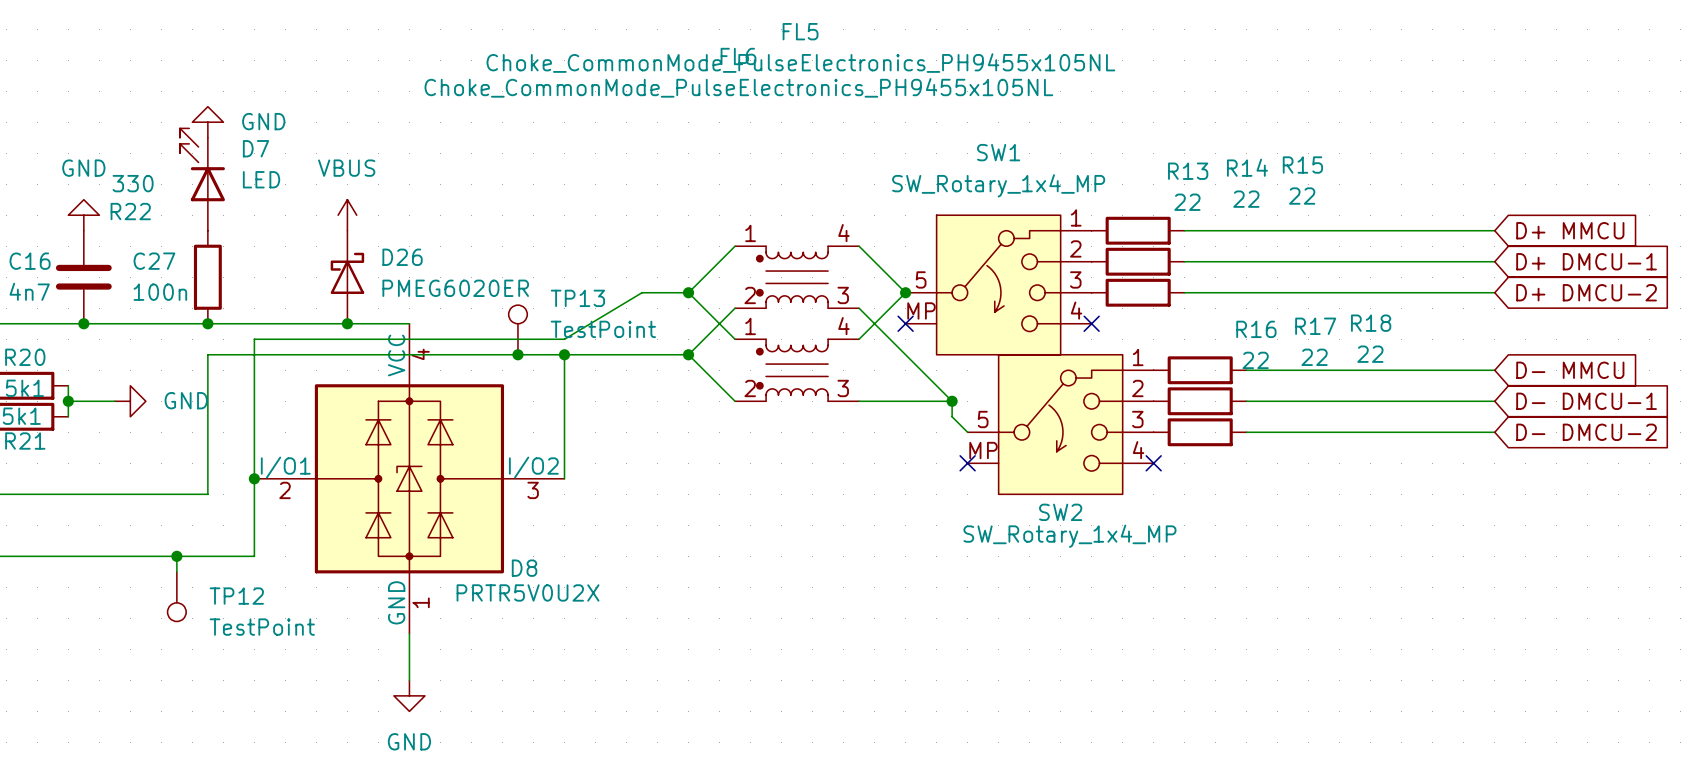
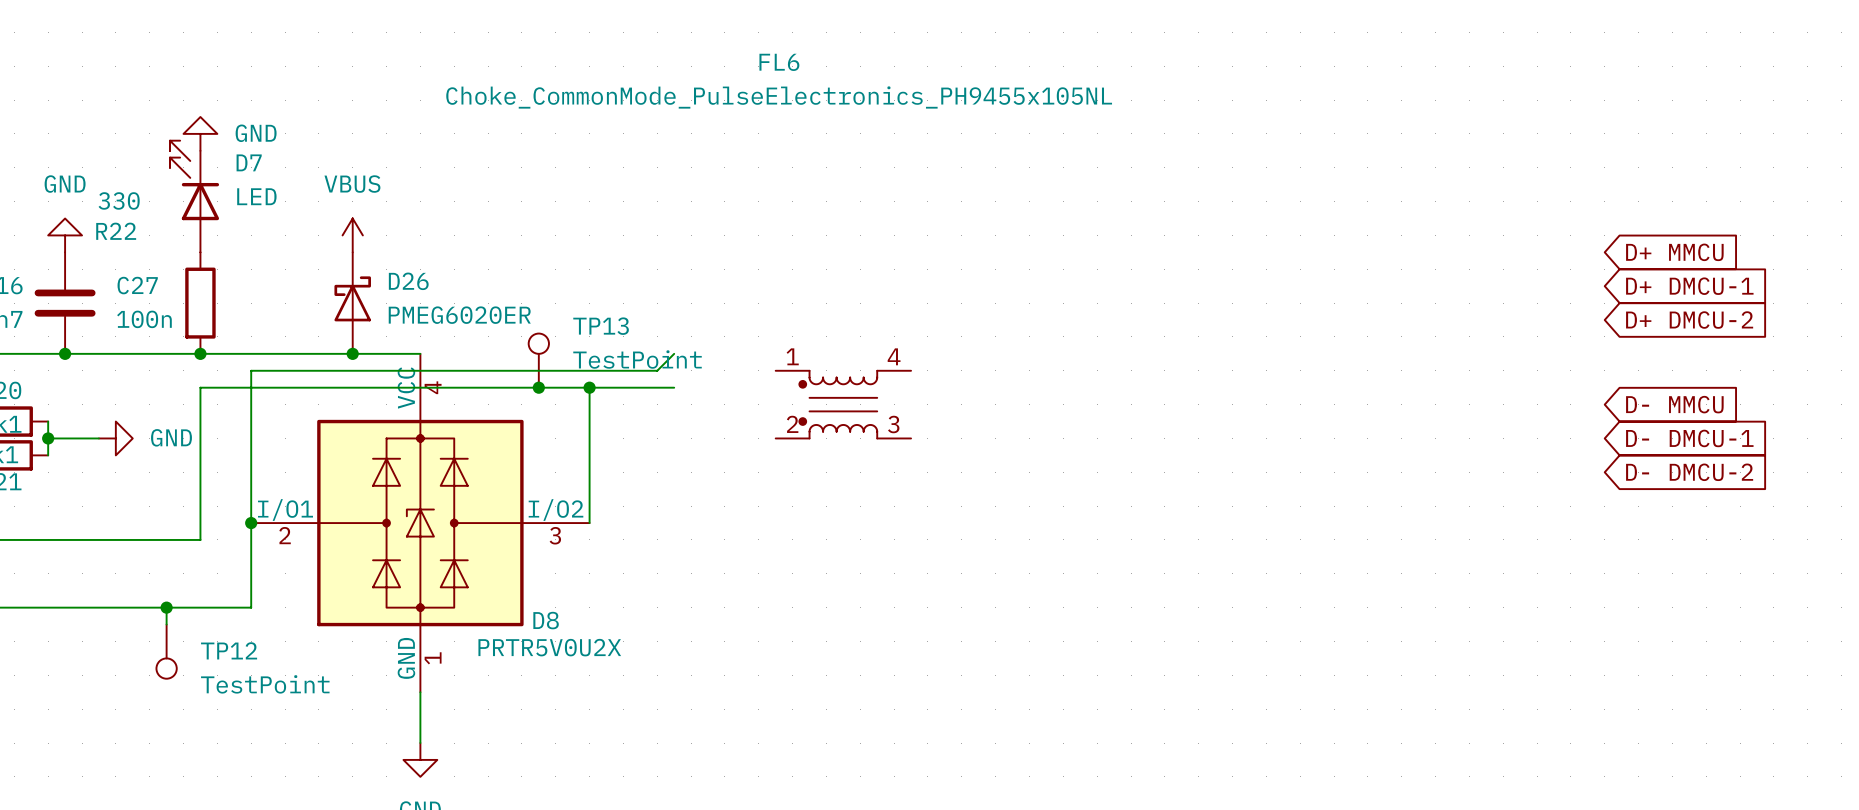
R13: 22 (1138, 230) -> none
wire: (1184, 230) (1494, 230) -> none
wire: (735, 246) (688, 292) -> none
wire: (859, 246) (905, 292) (859, 339) -> none
R14: 22 (1138, 261) -> none
wire: (1184, 261) (1494, 261) -> none
FL5: Choke_CommonMode_PulseElectronics_PH9455x105NL (797, 277) -> none
SW1: SW_Rotary_1x4_MP (998, 284) -> none
wire: (688, 292) (642, 292) (564, 339) -> (674, 353) (657, 370) (589, 370)
wire: (688, 292) (735, 339) -> none
junction: (688, 292) -> none
junction: (905, 292) -> none
R15: 22 (1138, 292) -> none
wire: (1184, 292) (1494, 292) -> none
wire: (735, 308) (688, 354) -> none
wire: (859, 308) (952, 401) -> none
no-connect mark: (905, 323) -> none
no-connect mark: (1091, 323) -> none
wire: (642, 354) (688, 354) -> none
wire: (688, 354) (735, 401) -> none
junction: (688, 354) -> none
R16: 22 (1200, 370) -> none
wire: (1246, 370) (1494, 370) -> none
wire: (859, 401) (952, 401) -> none
wire: (952, 401) (952, 416) (967, 432) -> none
junction: (952, 401) -> none
R17: 22 (1200, 401) -> none
wire: (1246, 401) (1494, 401) -> none
SW2: SW_Rotary_1x4_MP (1060, 424) -> none
R18: 22 (1200, 432) -> none
wire: (1246, 432) (1494, 432) -> none
no-connect mark: (967, 463) -> none
no-connect mark: (1153, 463) -> none

